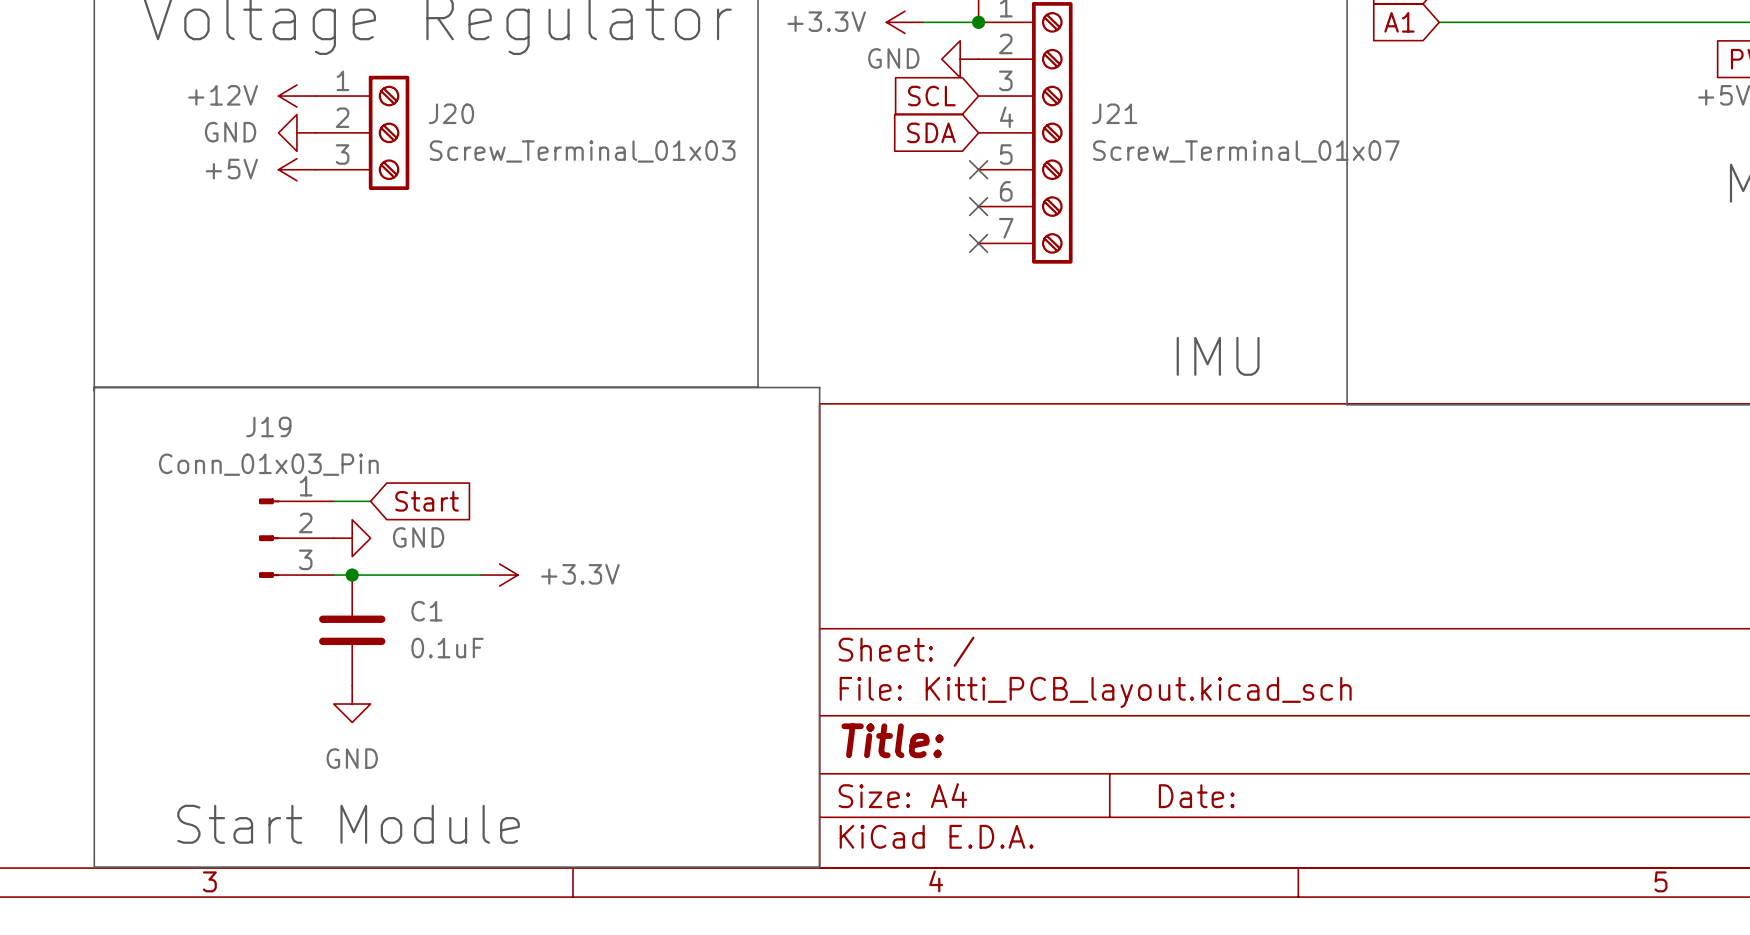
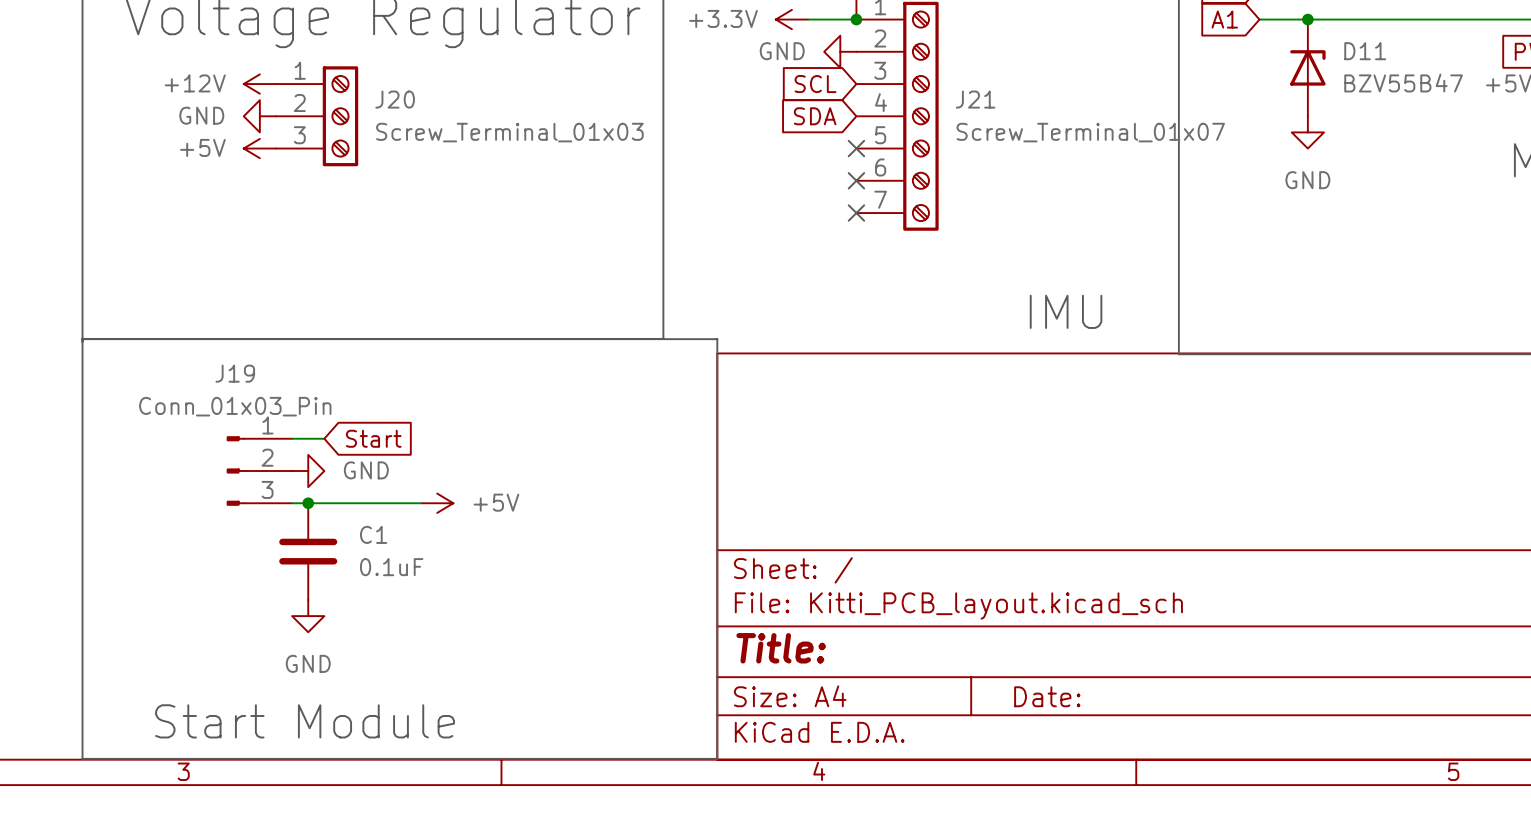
junction: none -> (1307, 19)
D11: none -> BZV55B47 (1307, 67)
power symbol: none -> GND (1307, 132)
power symbol: +3.3V (499, 575) -> +5V (437, 503)

